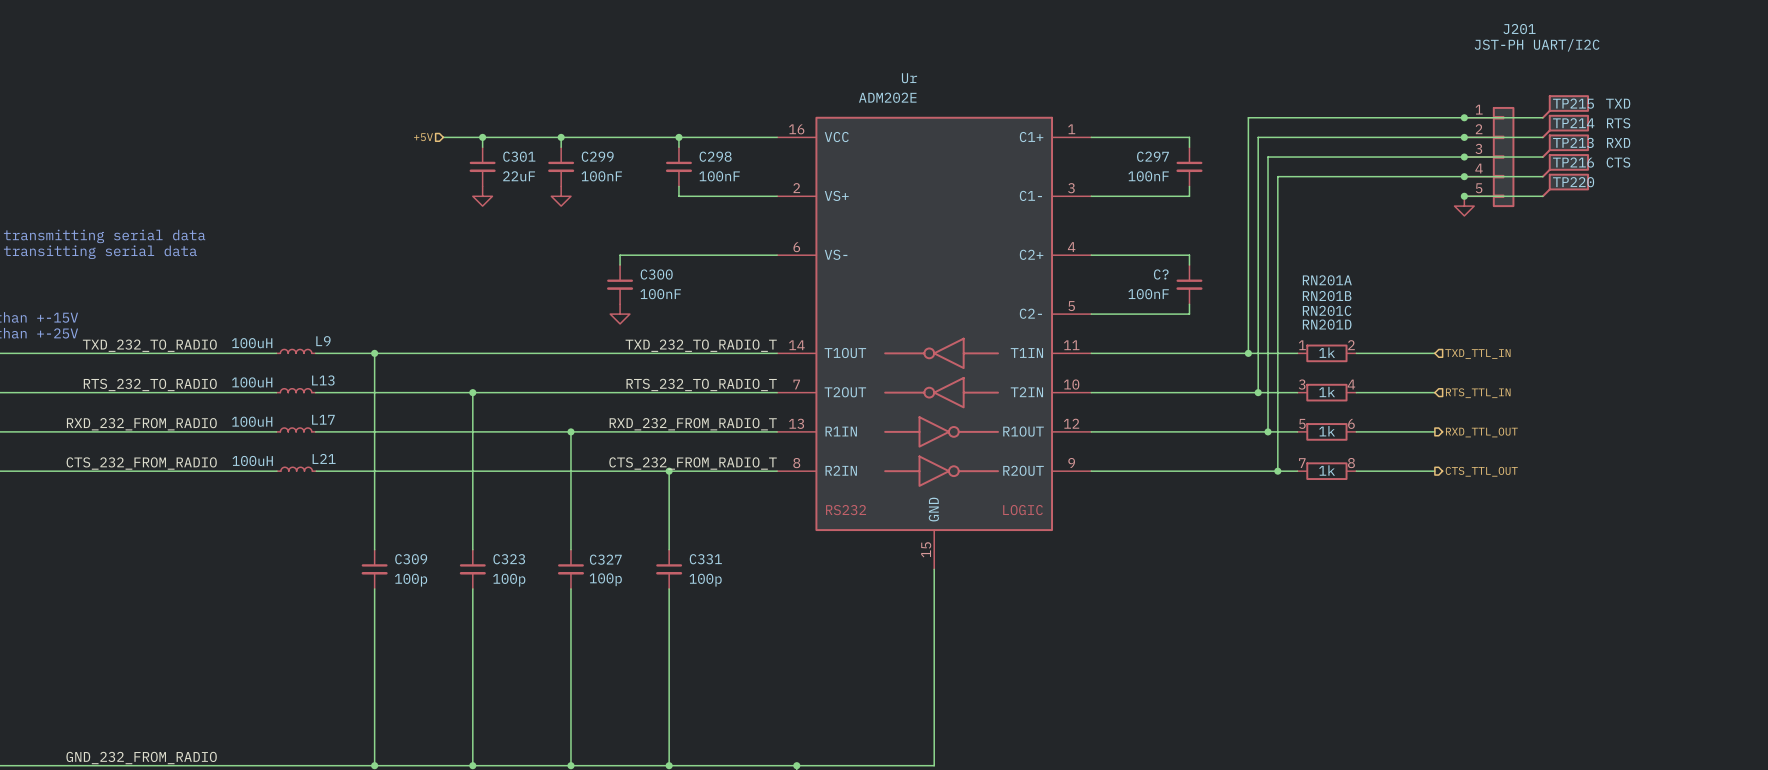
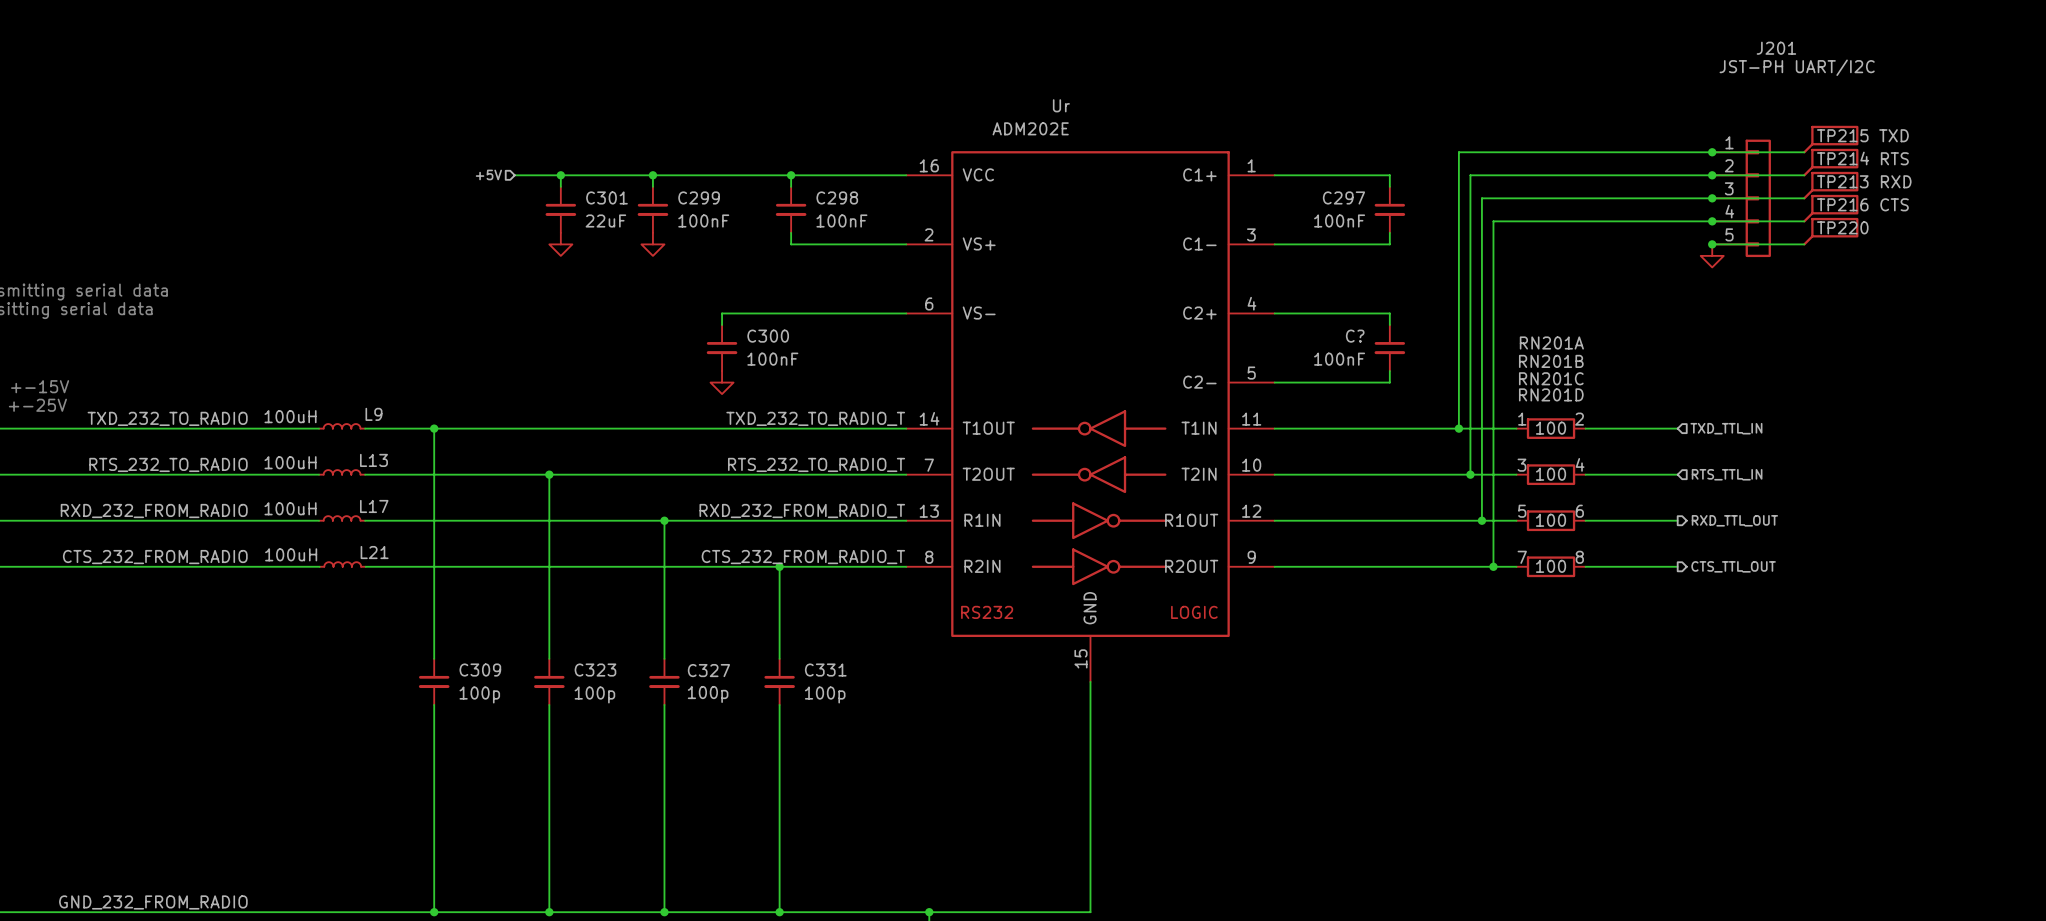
RN201A value: 1k (1327, 352) -> 100 (1551, 428)
RN201B value: 1k (1327, 391) -> 100 (1551, 474)
RN201C value: 1k (1327, 431) -> 100 (1551, 520)
RN201D value: 1k (1327, 470) -> 100 (1551, 566)

